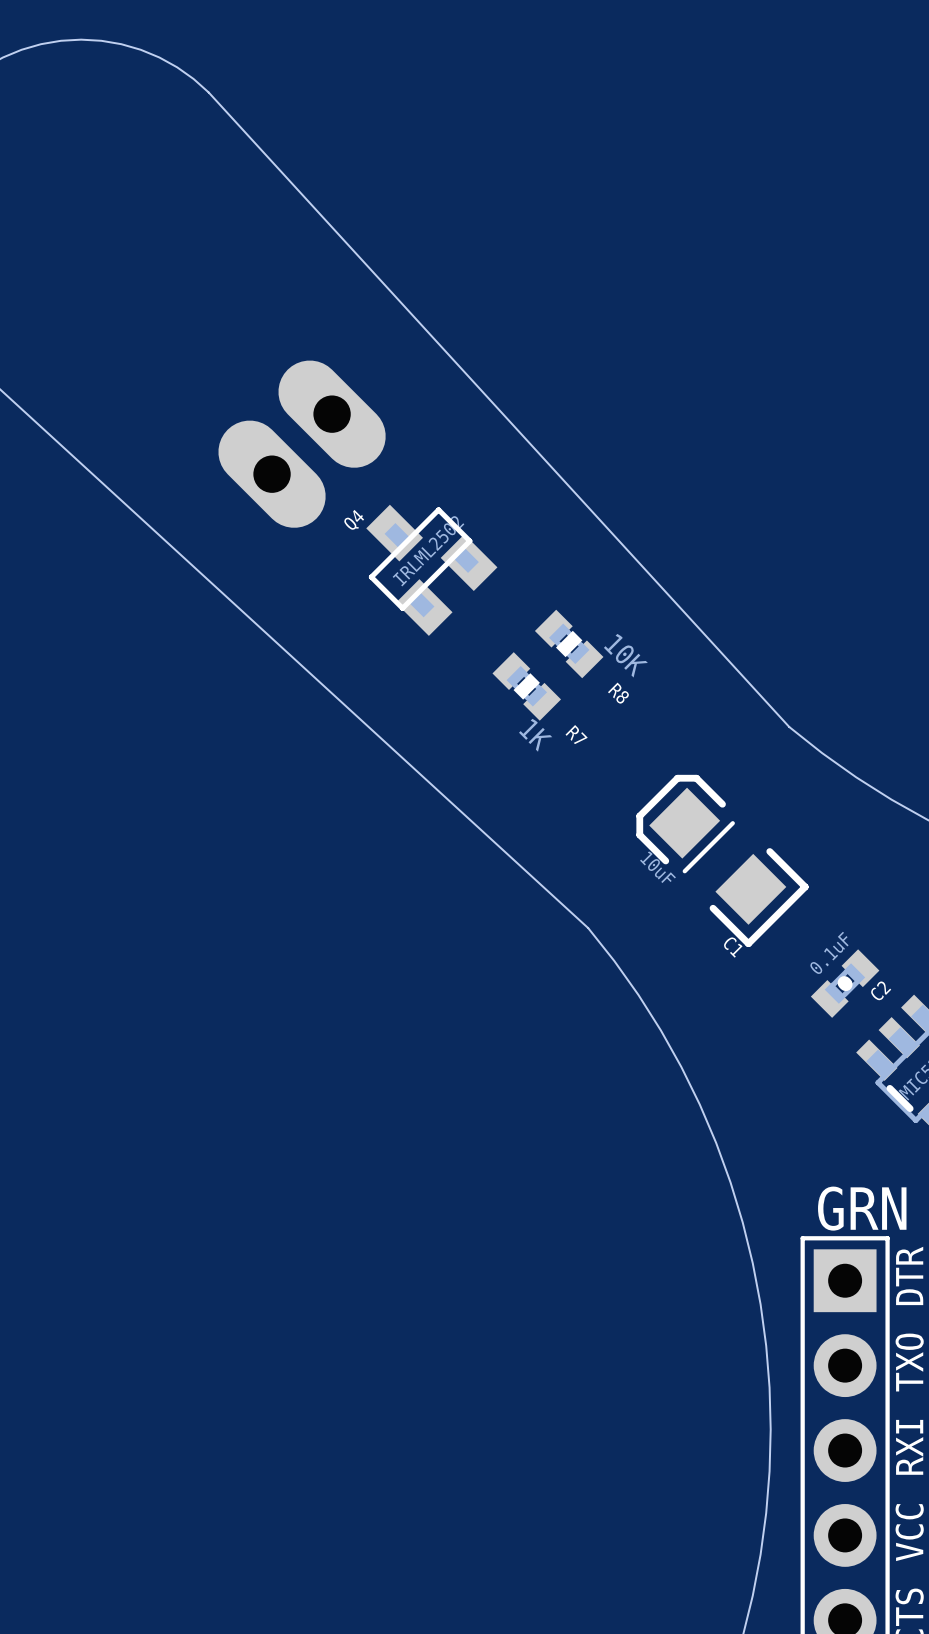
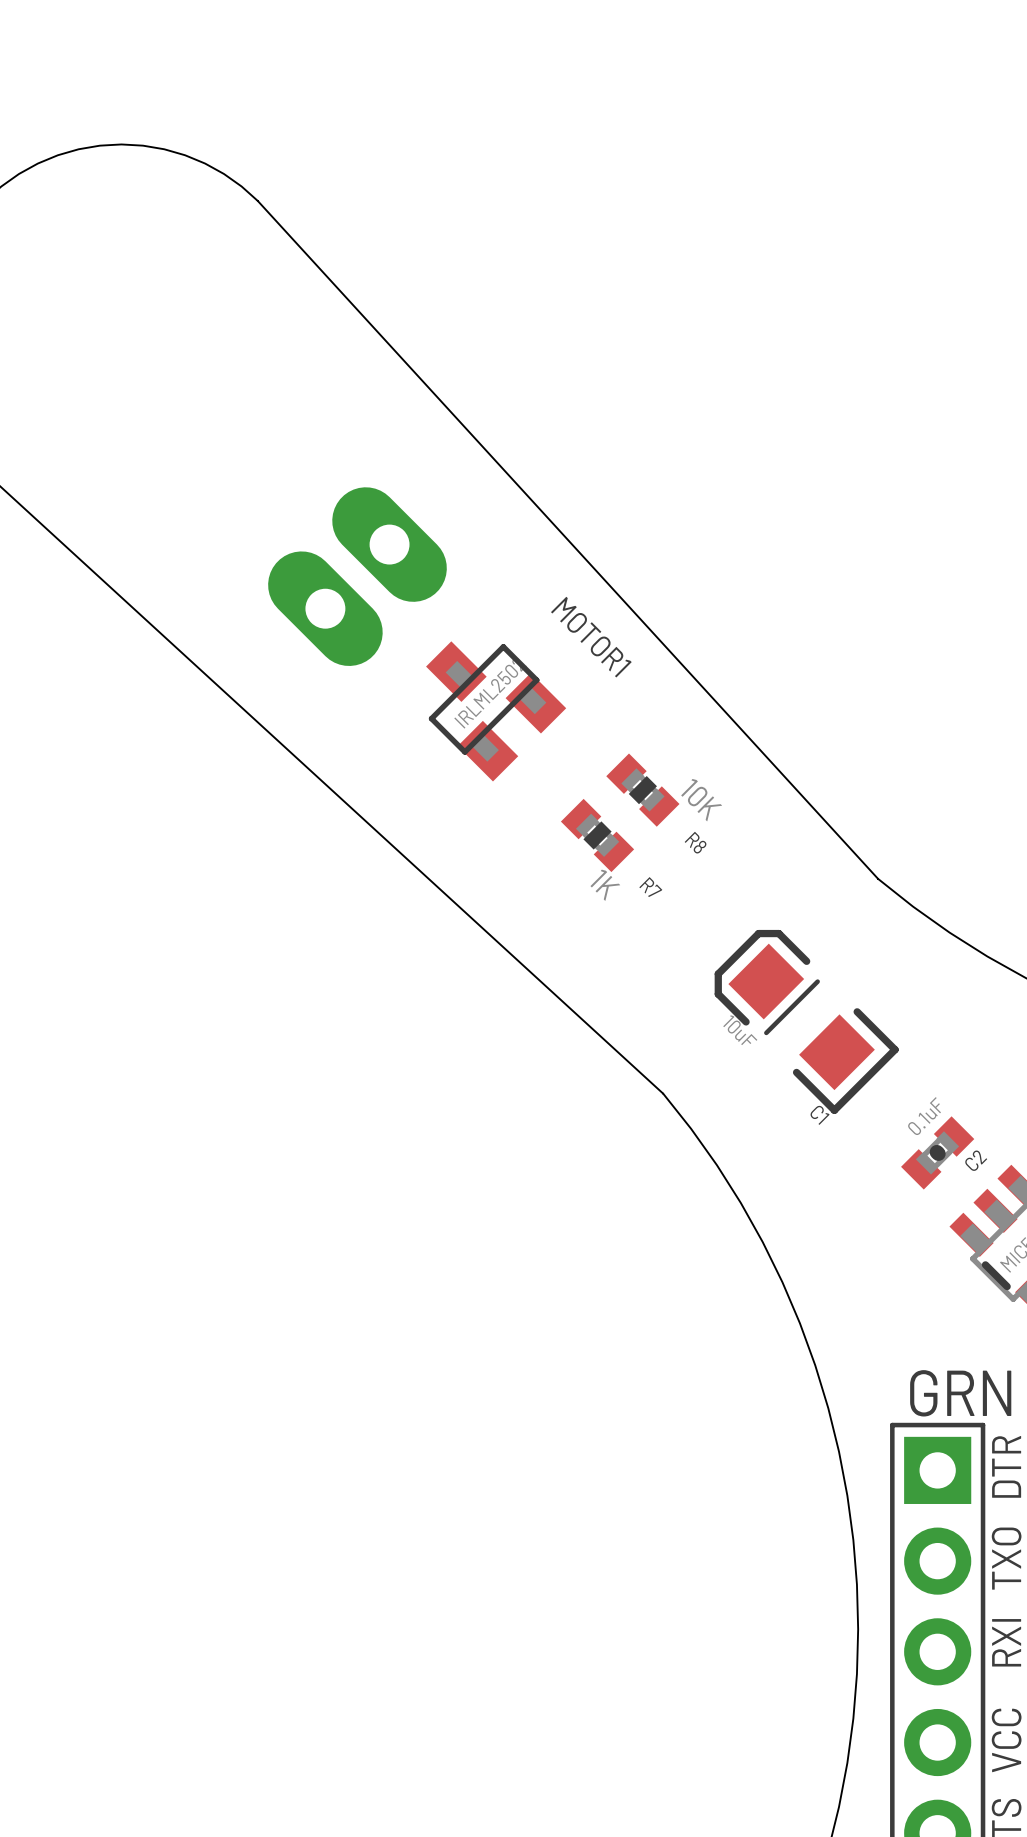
Q4 name: Q4 (354, 520) -> MOTOR1 (591, 637)

